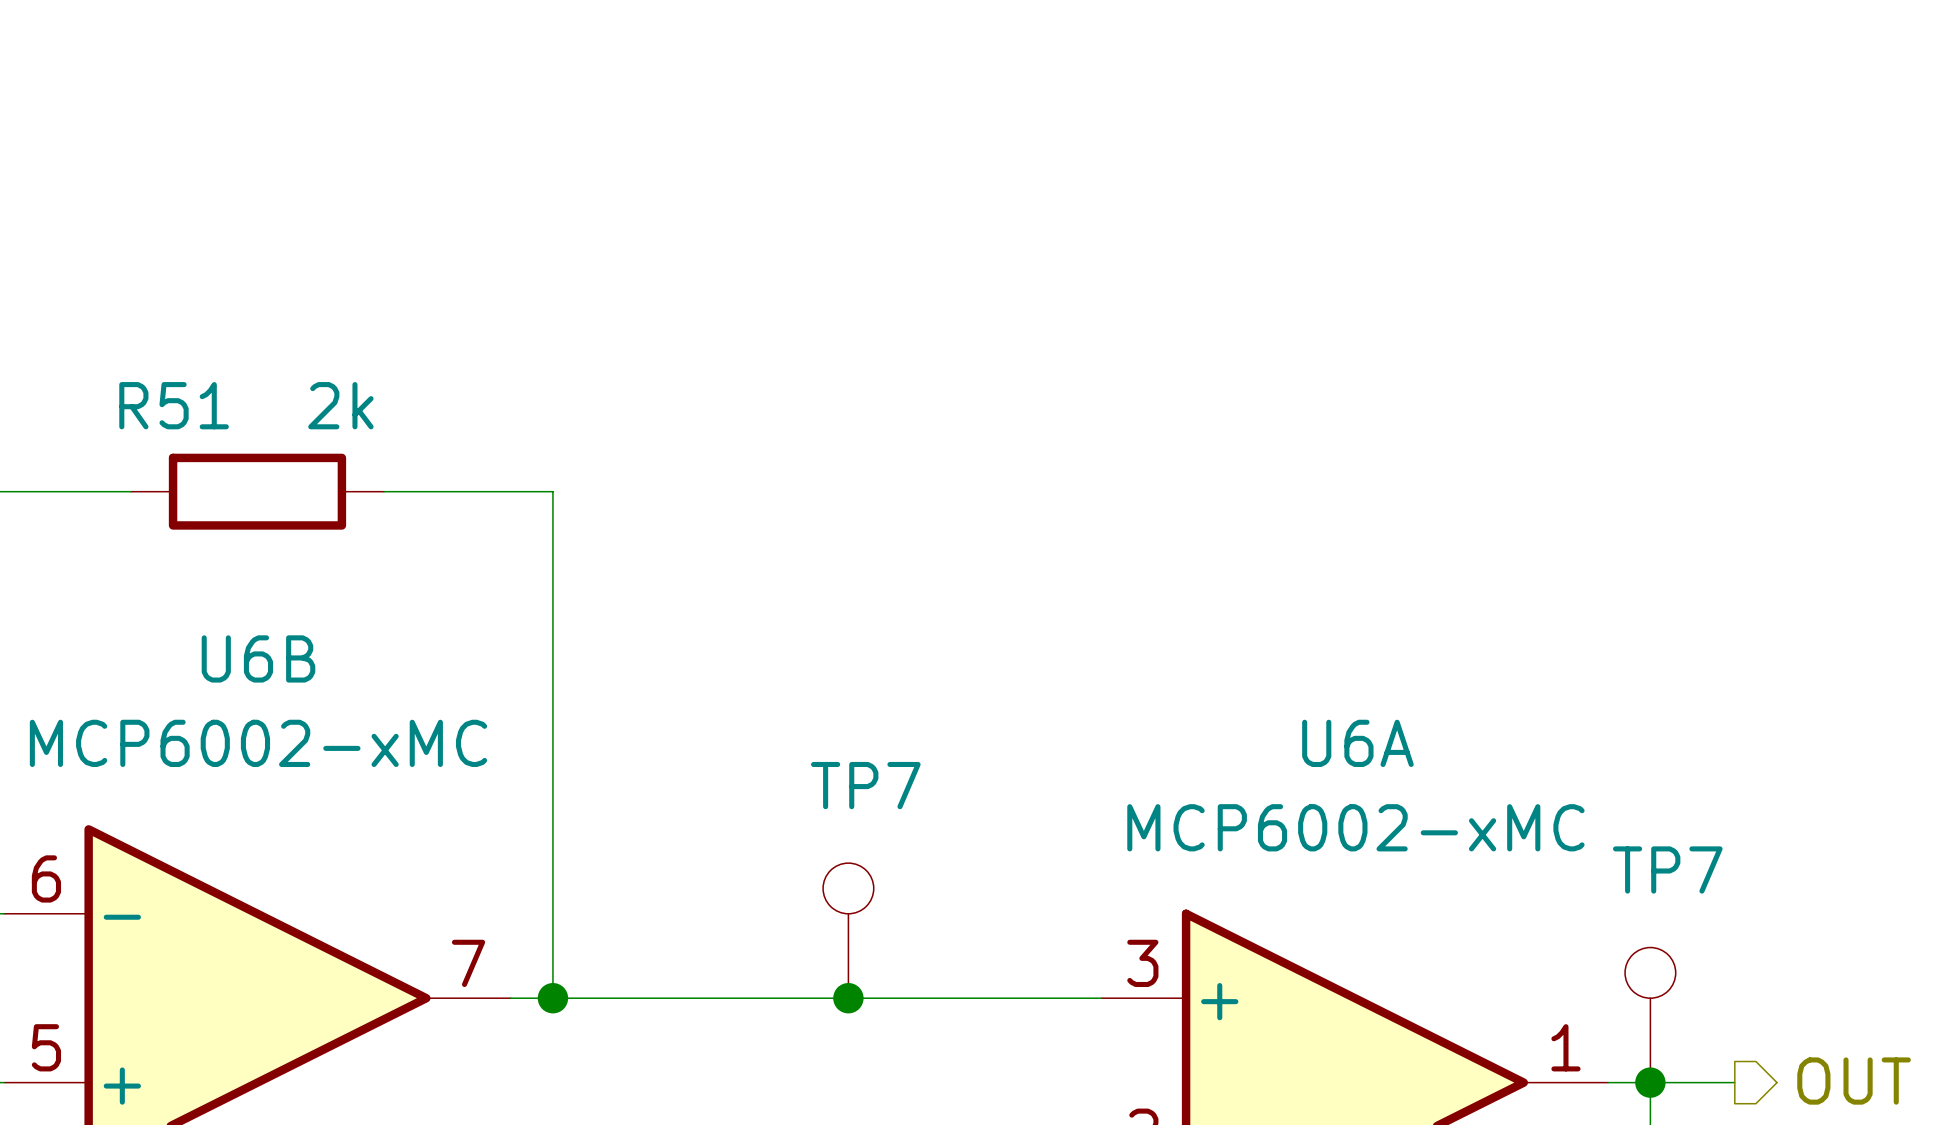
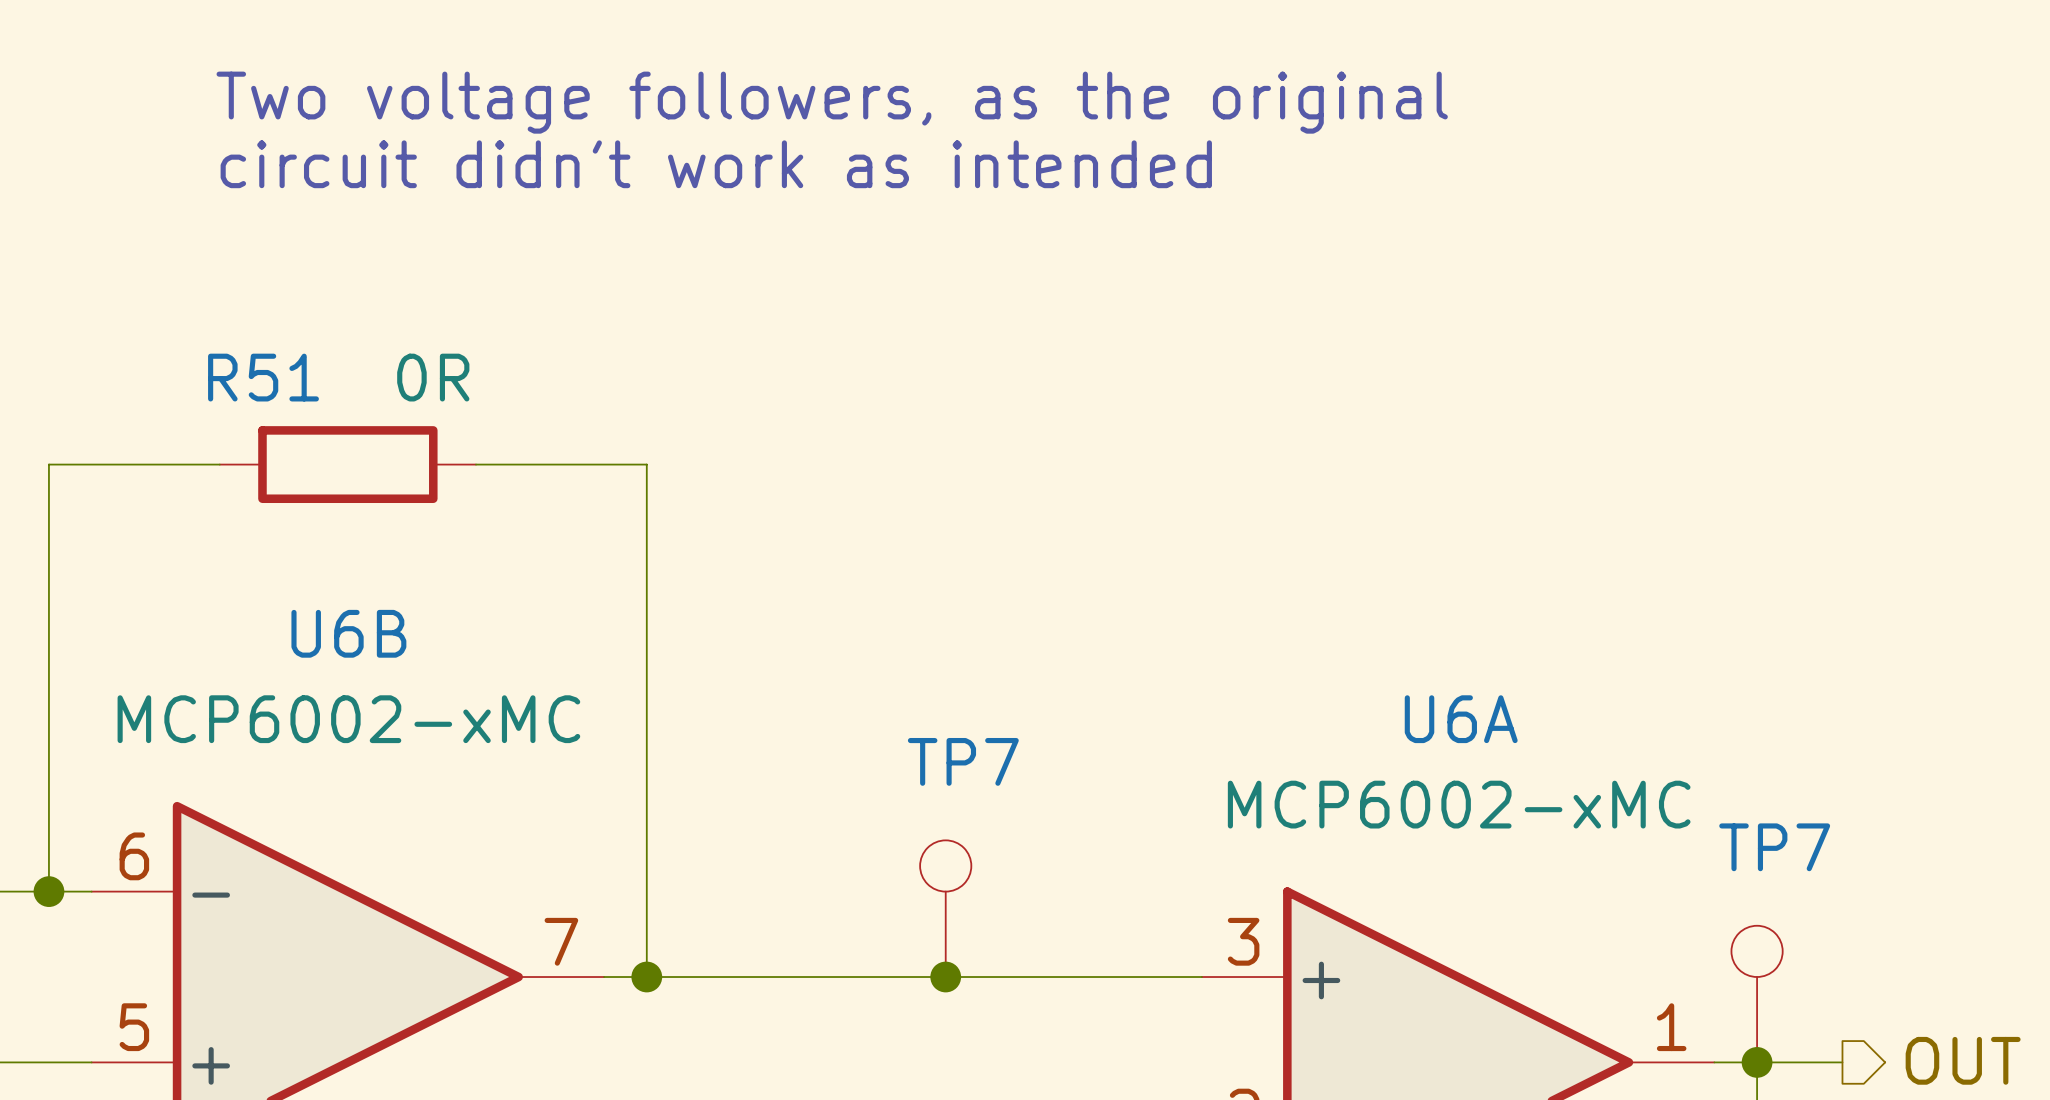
text: none -> Two voltage followers, as the original (832, 102)
text: none -> circuit didn't work as intended (716, 164)
R51 value: 2k (340, 405) -> 0R (433, 377)

